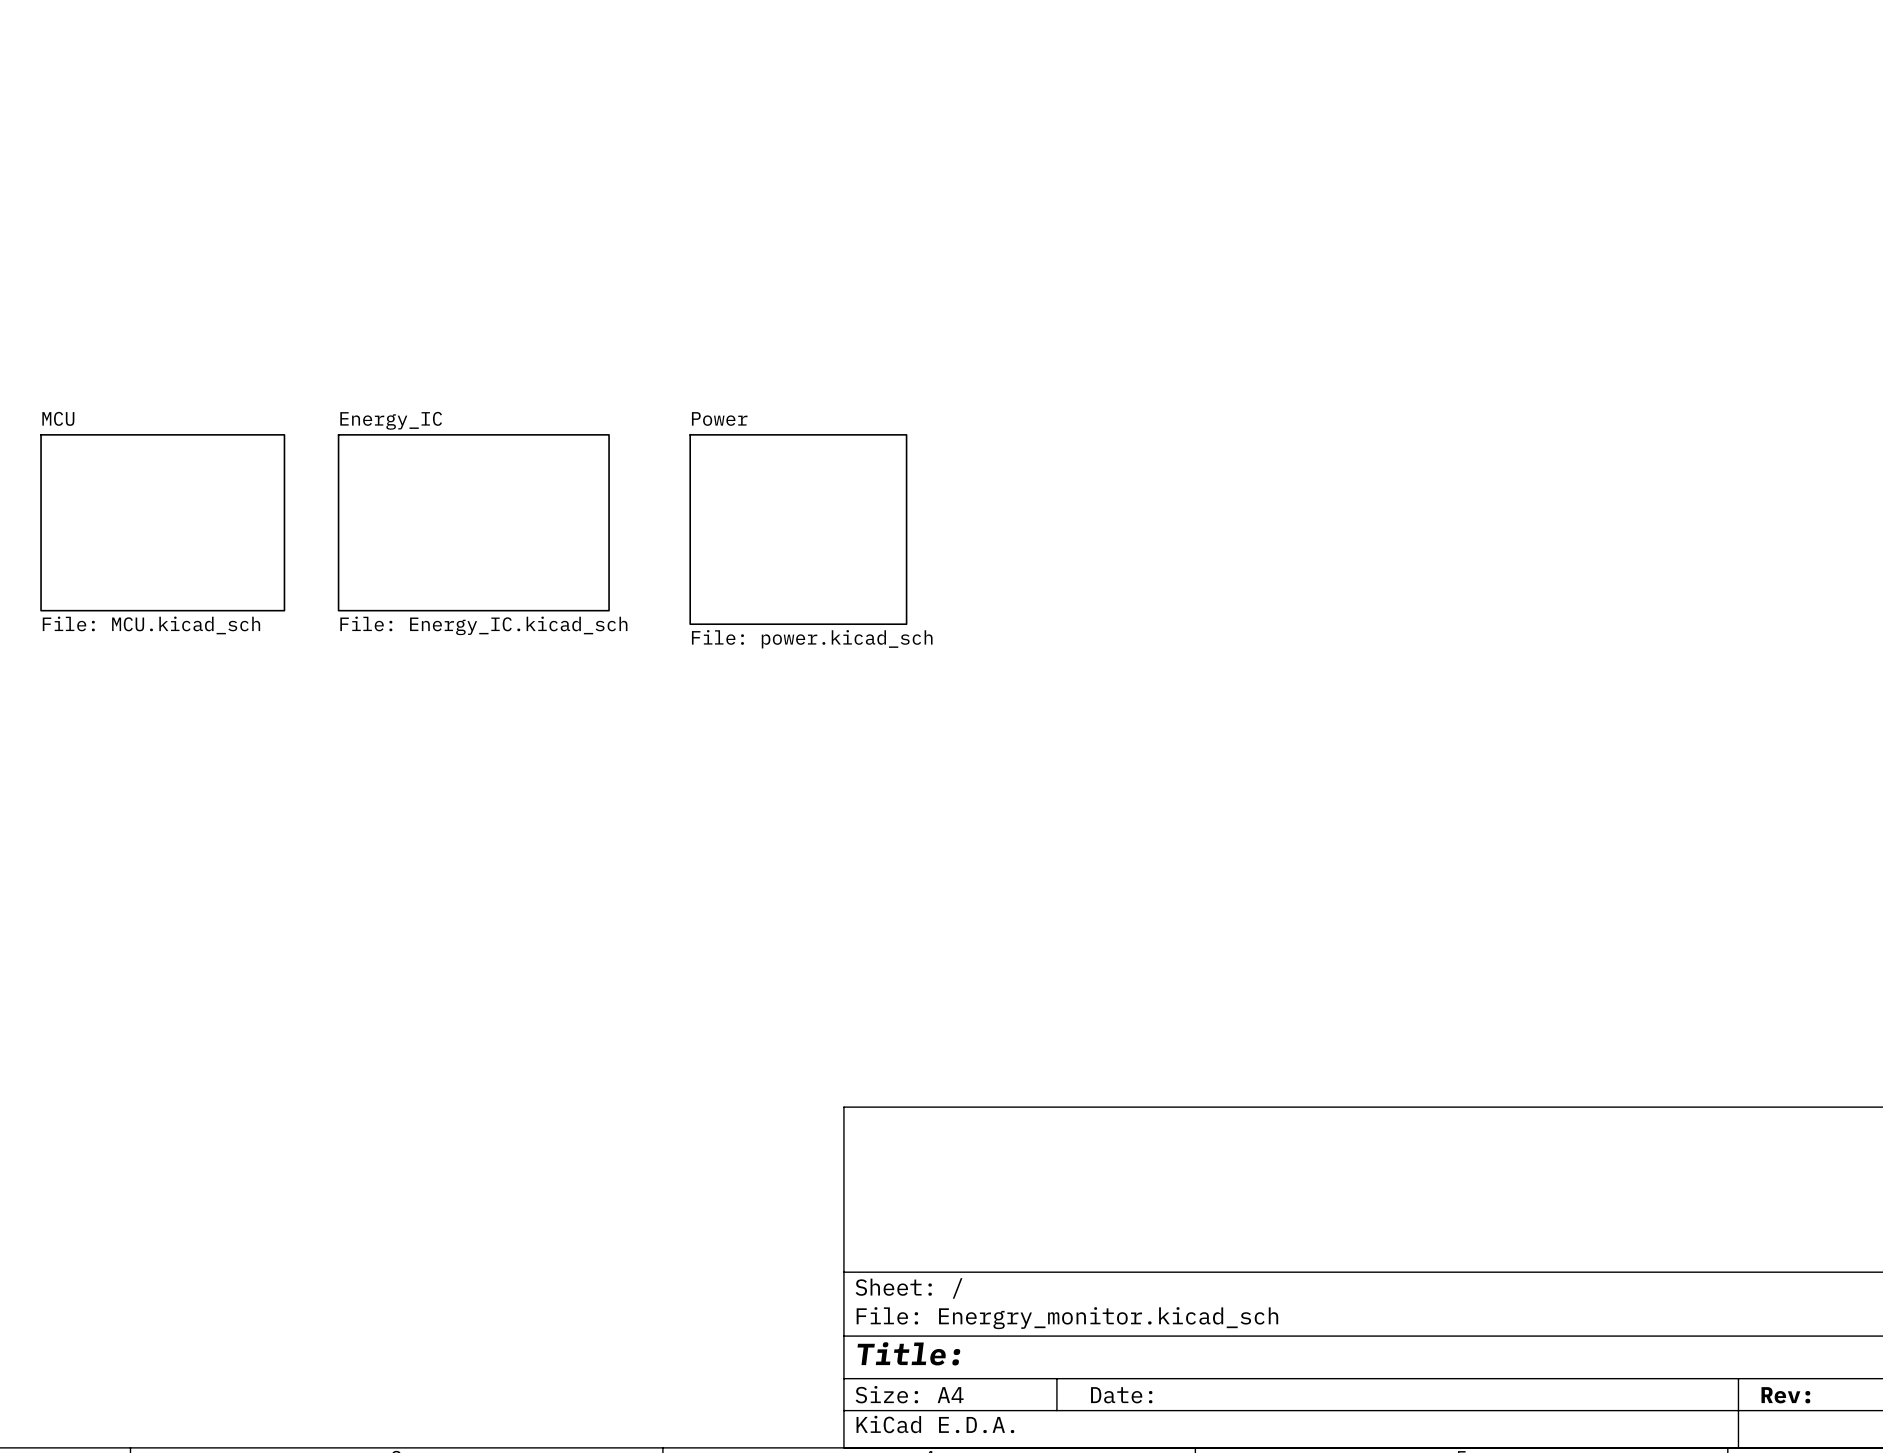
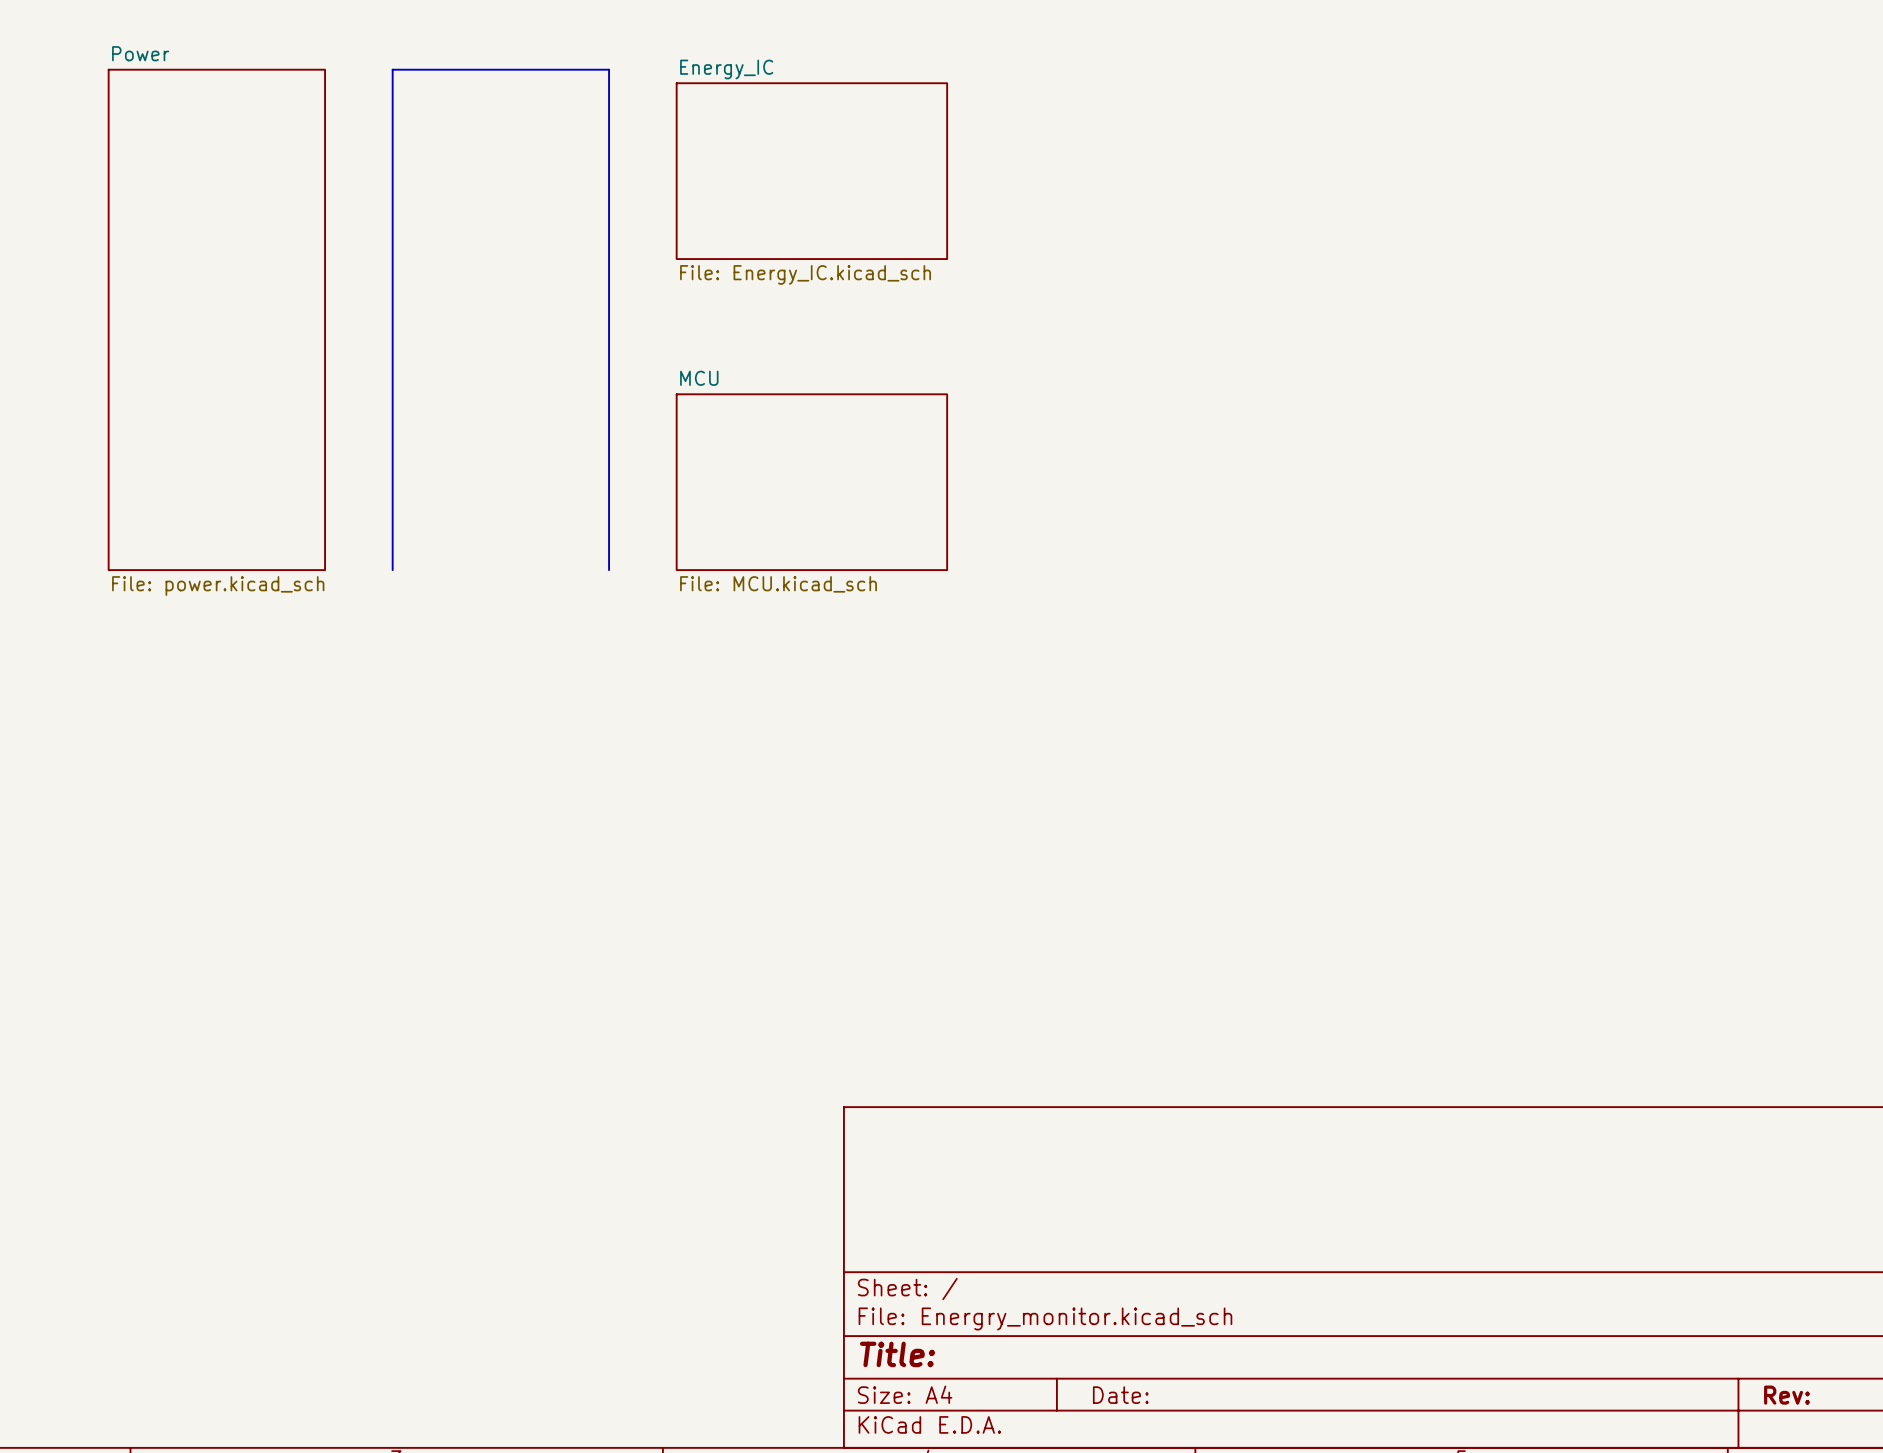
sheet Energy_IC: none -> File: Energy_IC.kicad_sch (811, 171)
sheet Power: none -> File: power.kicad_sch (216, 319)
sheet MCU: none -> File: MCU.kicad_sch (811, 482)
sheet MCU: File: MCU.kicad_sch (162, 522) -> none
sheet Energy_IC: File: Energy_IC.kicad_sch (473, 522) -> none
sheet Power: File: power.kicad_sch (798, 529) -> none
bus: none -> (392, 570) (392, 69) (609, 69) (609, 570)

